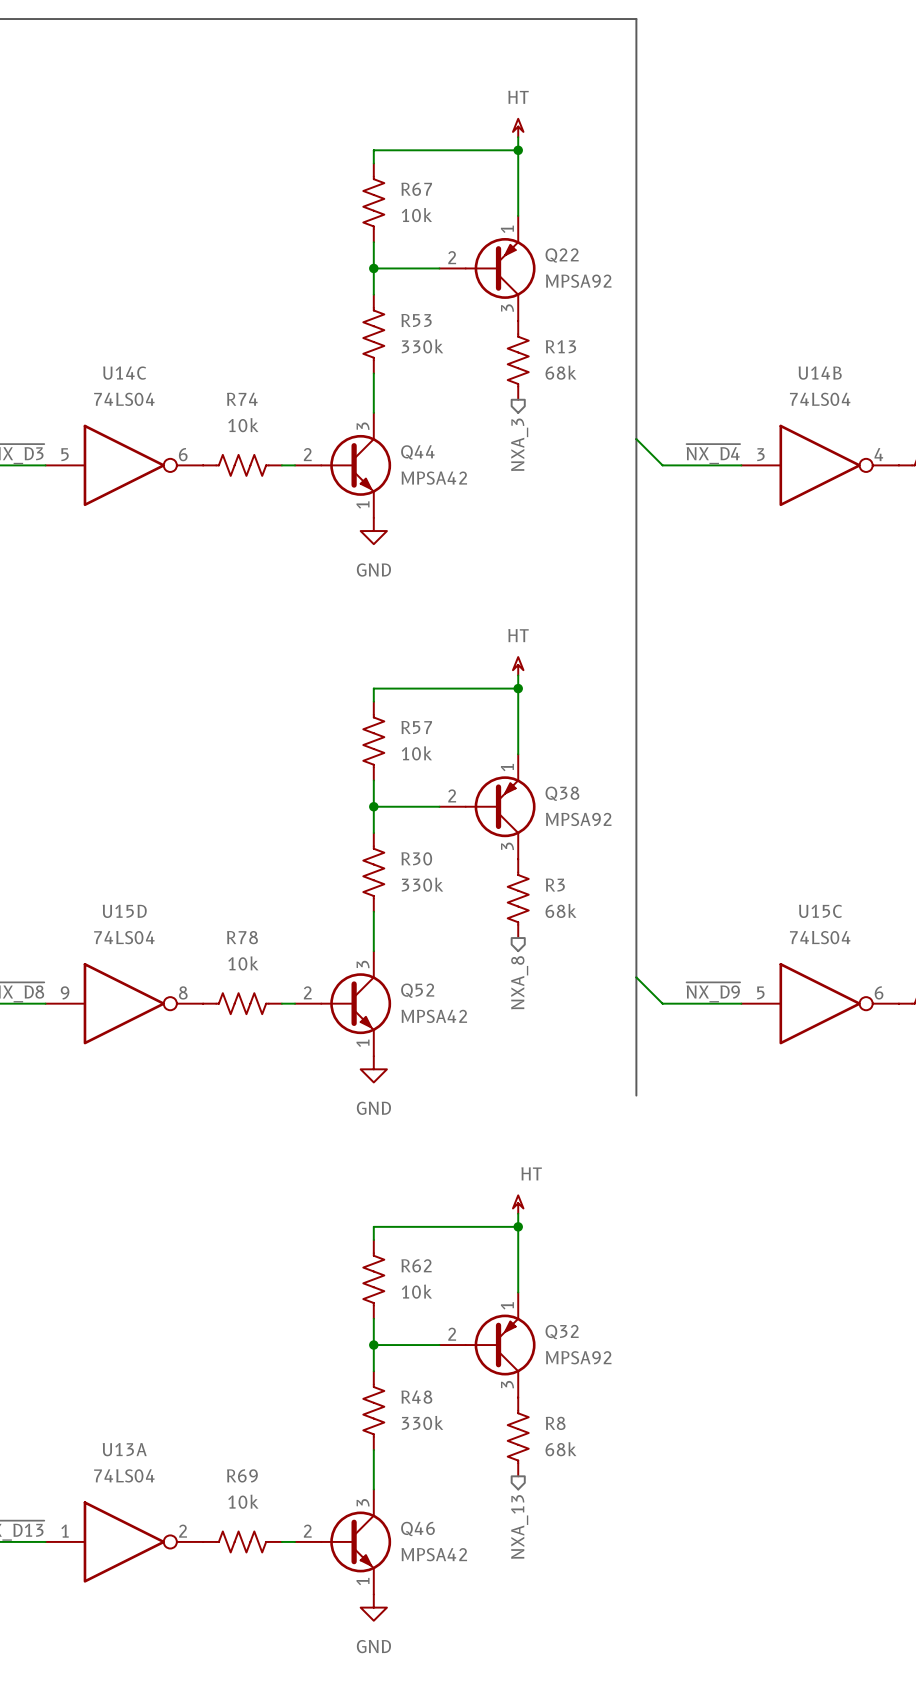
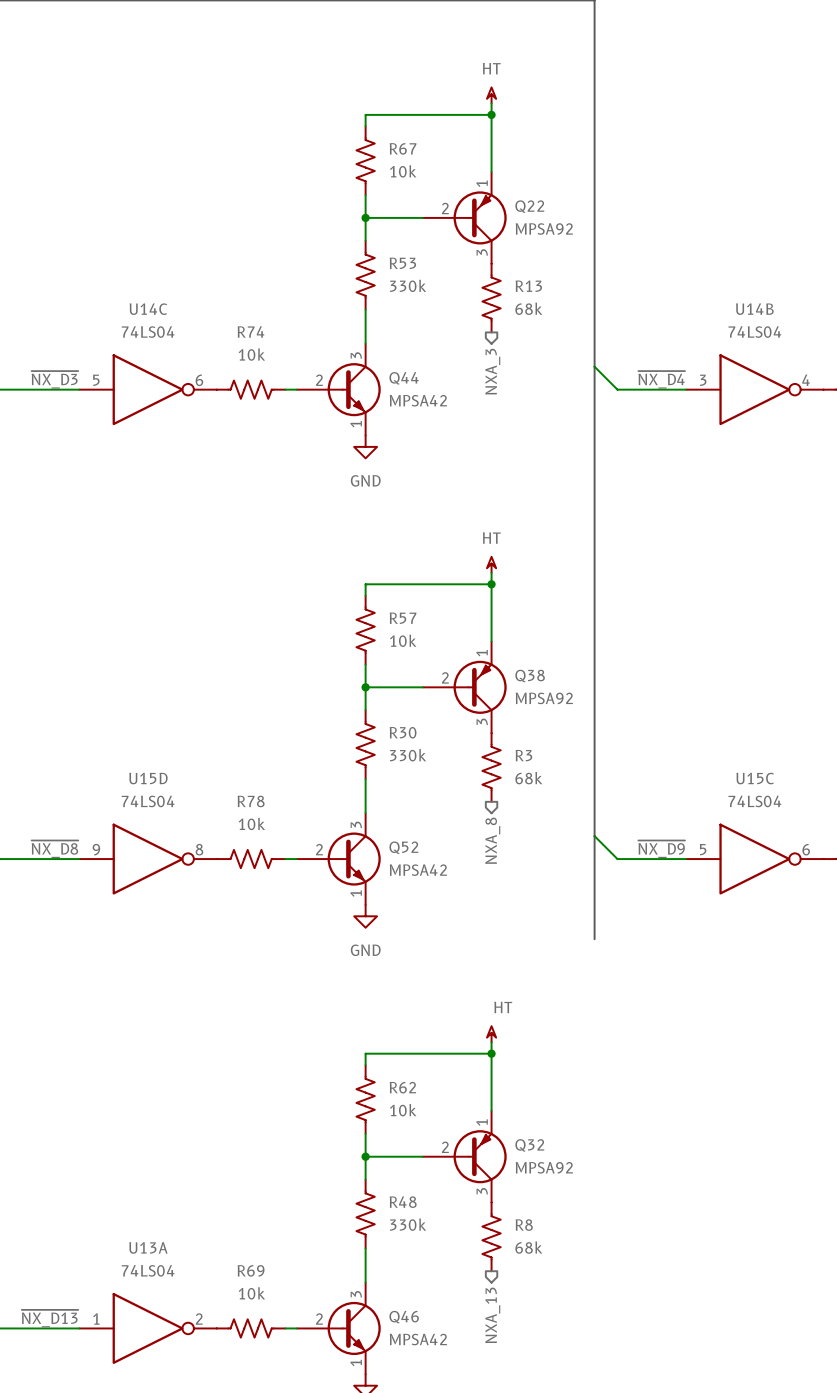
Q22 symbol: [439, 215, 536, 321] -> [422, 172, 507, 264]
Q44 symbol: [295, 412, 392, 518] -> [296, 343, 381, 436]
Q38 symbol: [439, 754, 536, 860] -> [422, 641, 507, 734]
Q52 symbol: [295, 951, 392, 1057] -> [296, 813, 381, 905]
Q32 symbol: [439, 1292, 536, 1398] -> [422, 1110, 507, 1203]
Q46 symbol: [295, 1489, 392, 1595] -> [296, 1282, 381, 1375]

